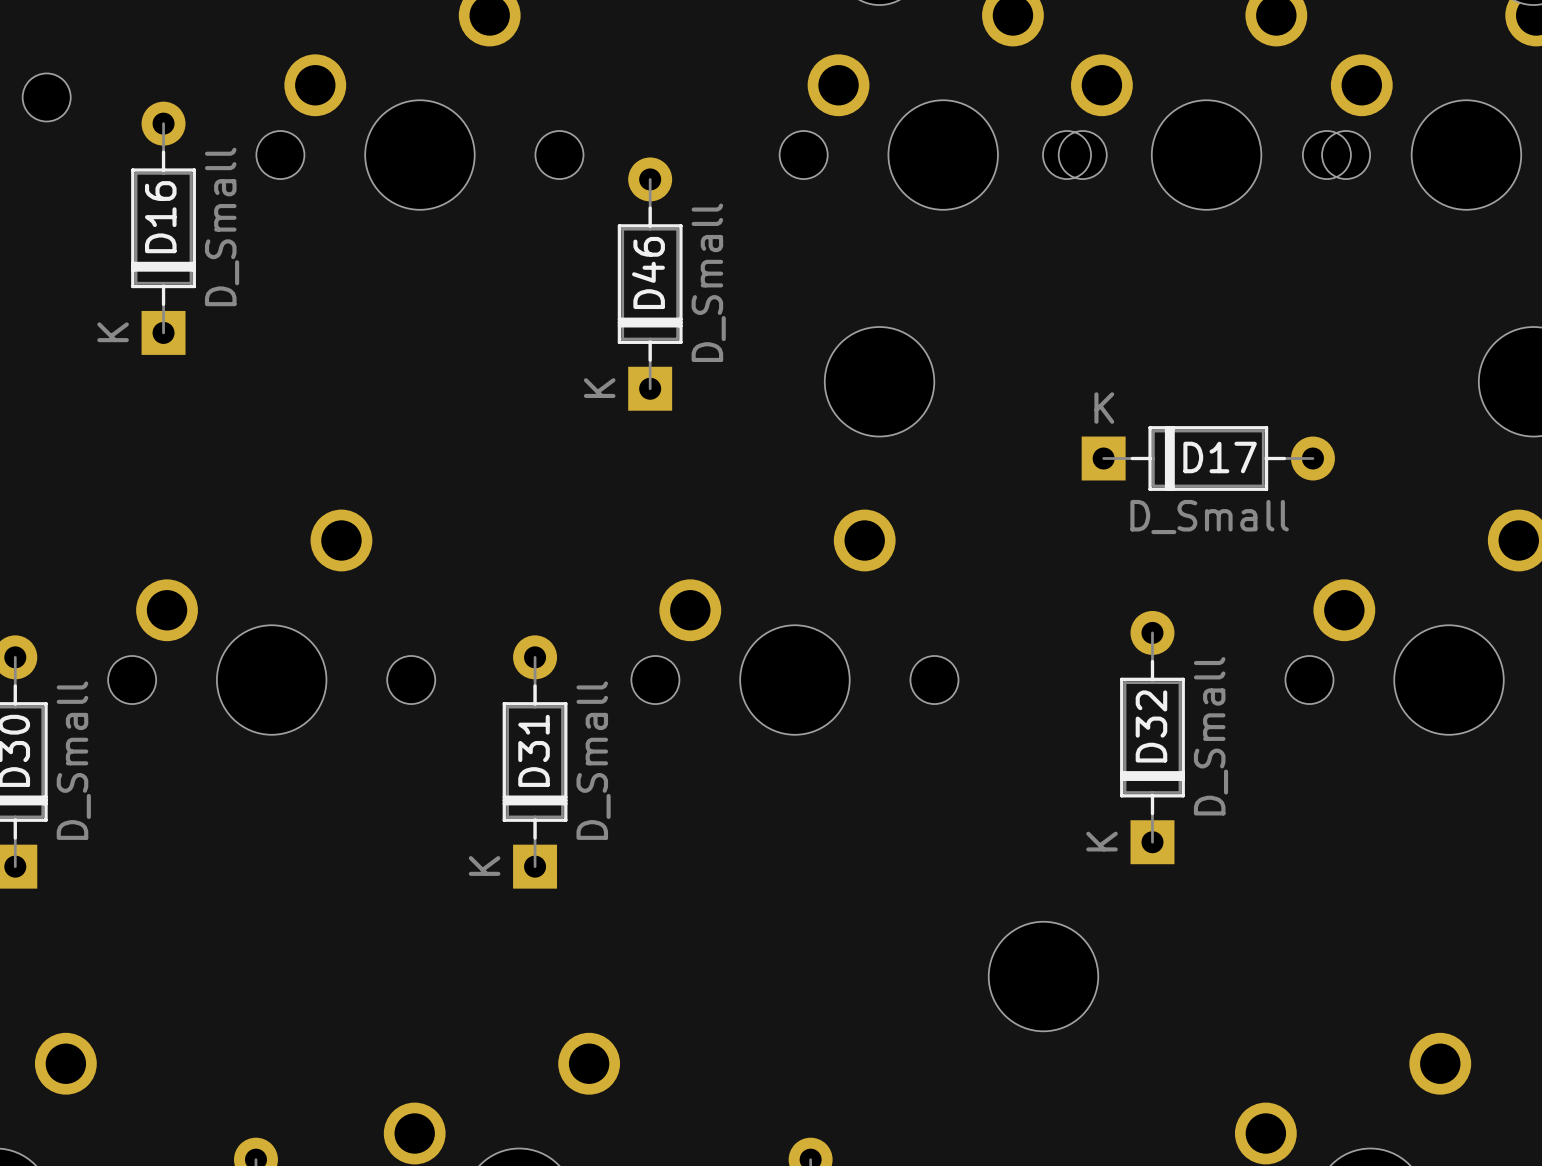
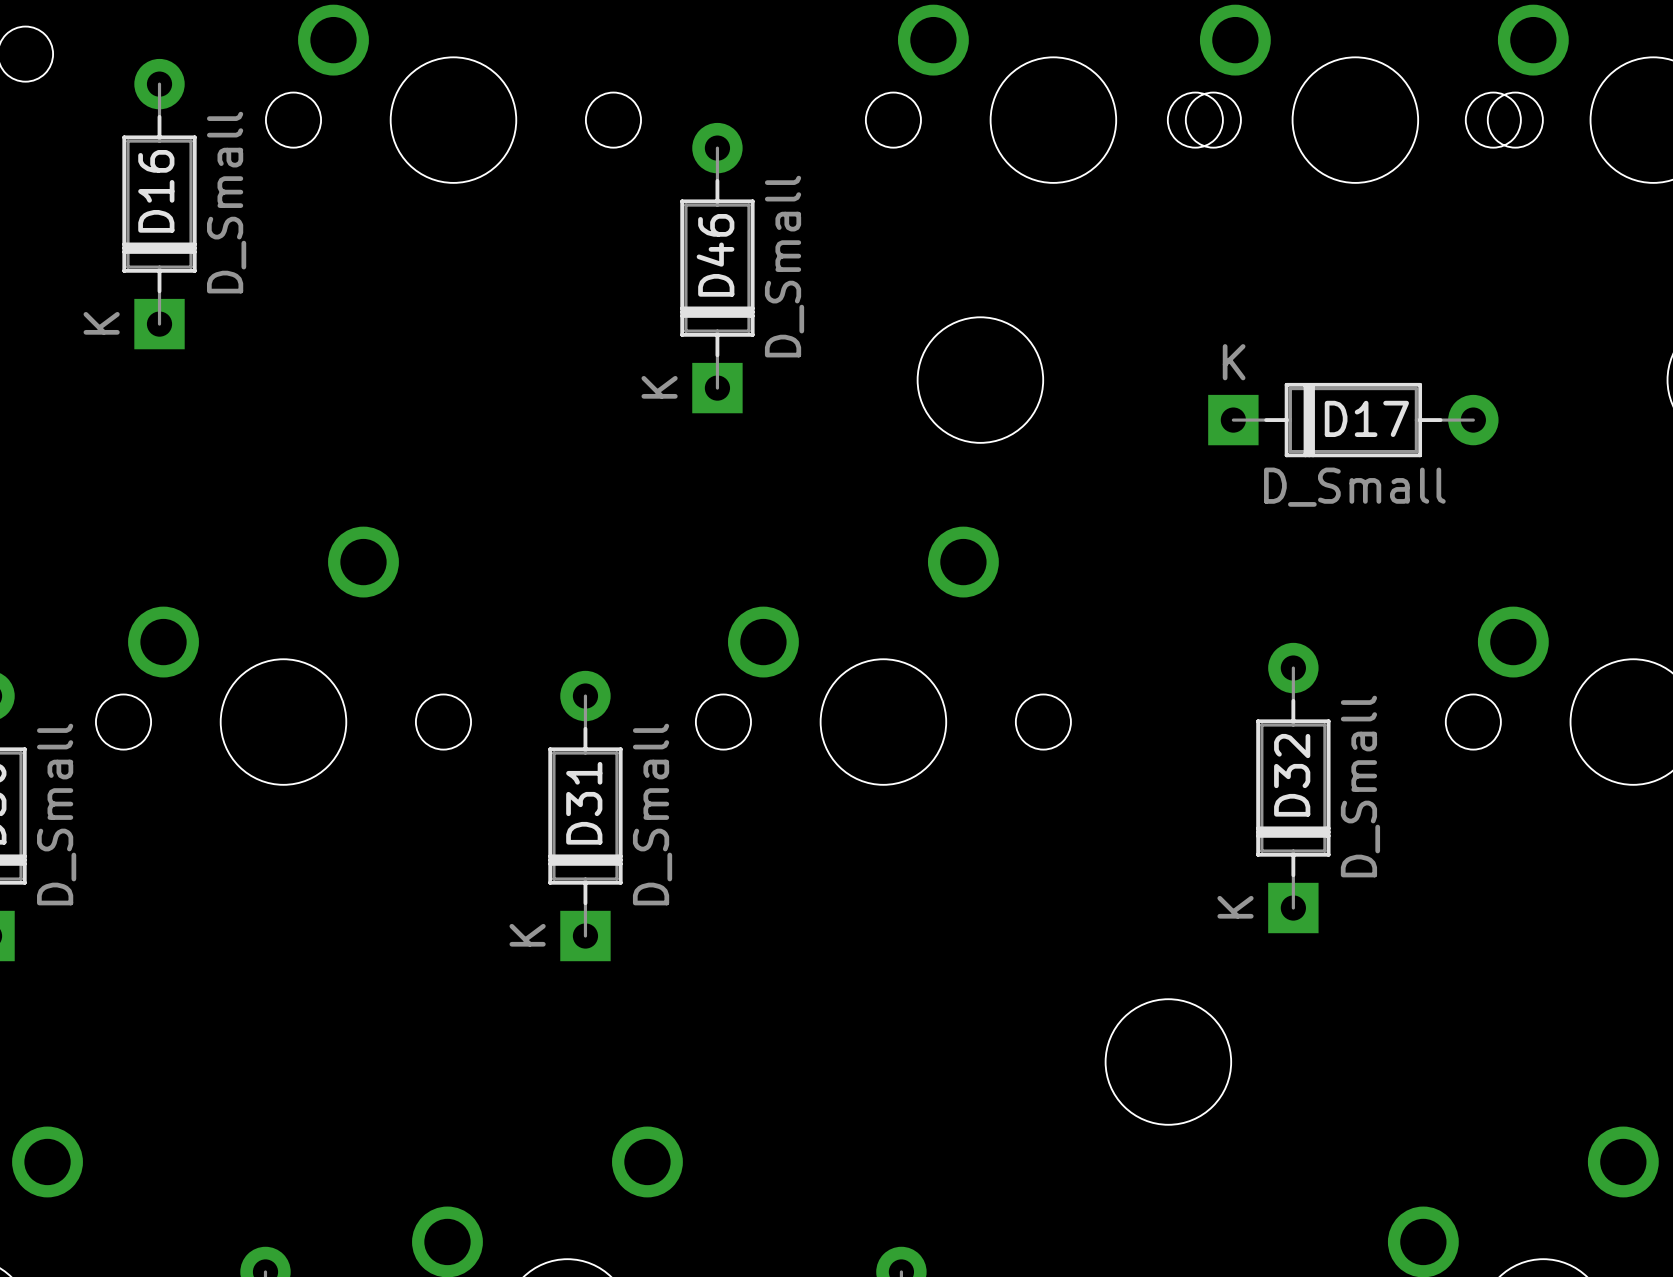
D17 position: (1208, 458) -> (1353, 420)

